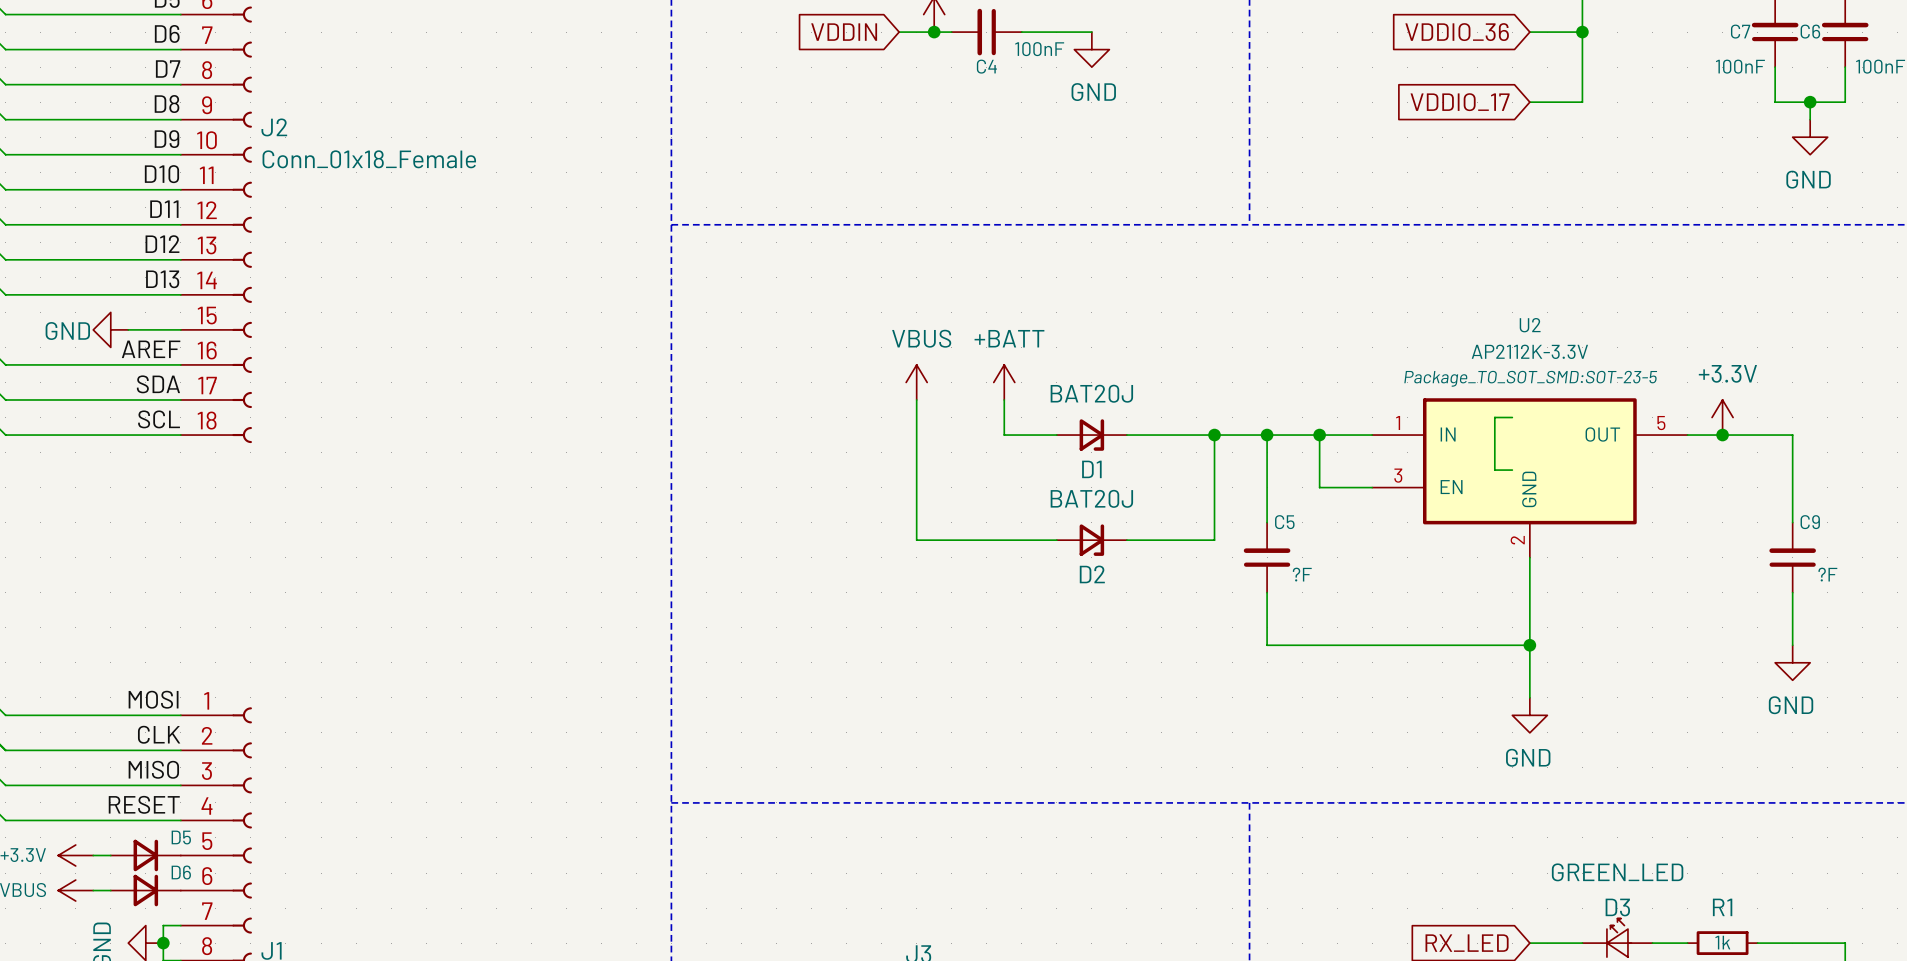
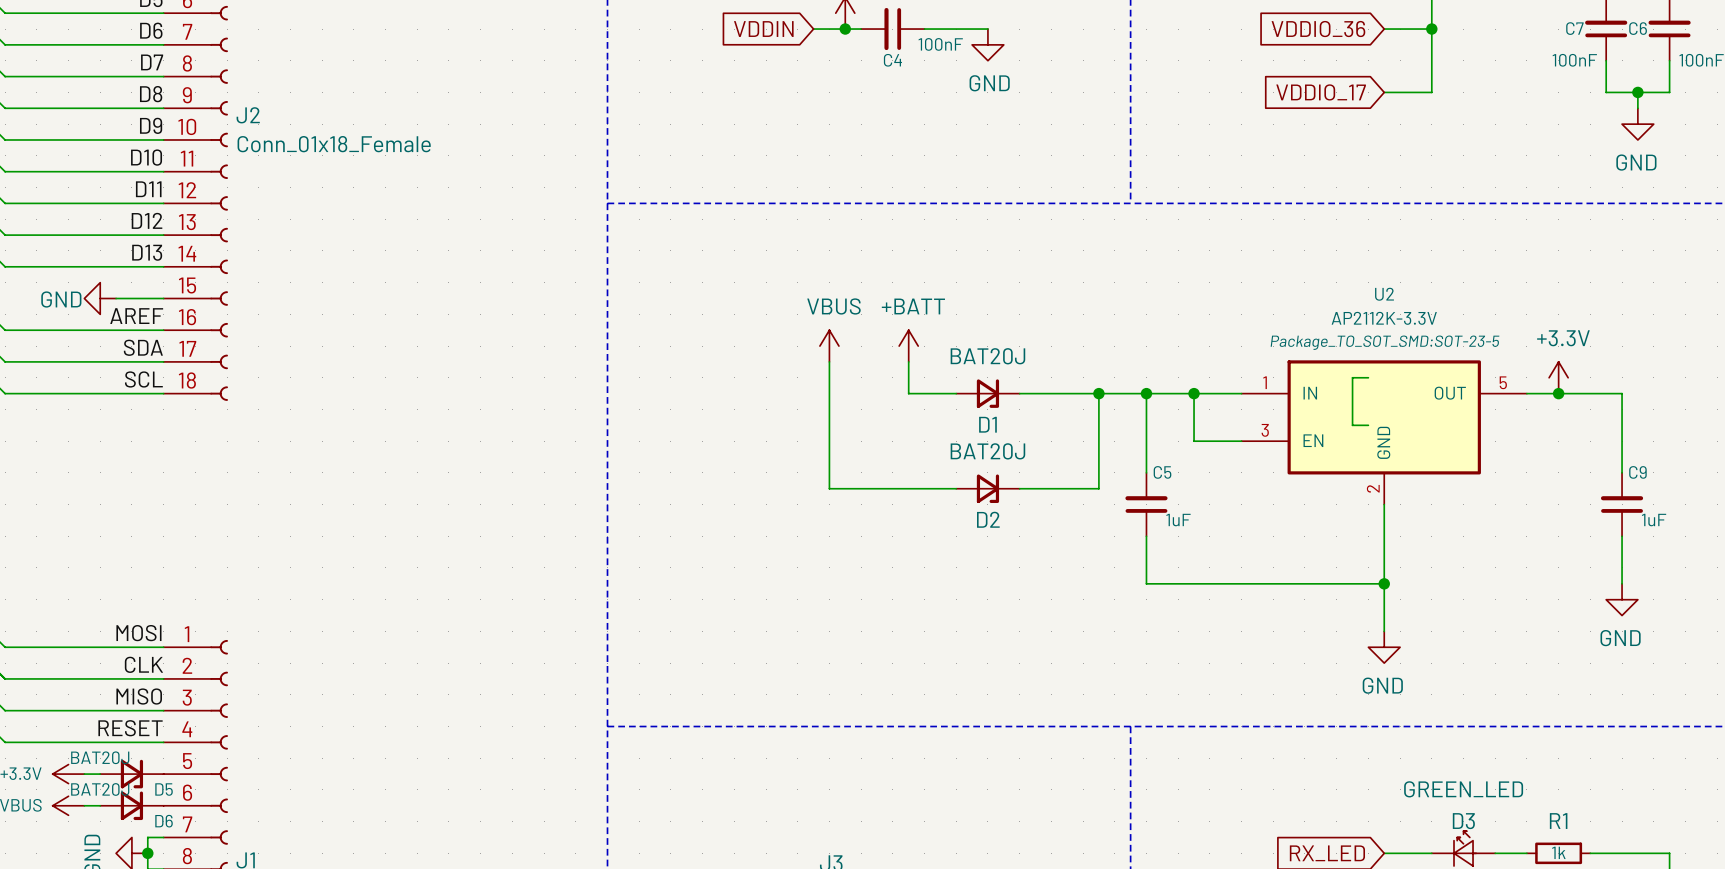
C5 value: ?F (1302, 574) -> 1uF (1178, 520)
C9 value: ?F (1827, 574) -> 1uF (1654, 520)
D5 value: none -> BAT20J (100, 757)
D5 name position: D5 (181, 837) -> D5 (164, 789)
D5 symbol: [110, 839, 181, 872] -> [100, 759, 164, 789]
D6 value: none -> BAT20J (100, 789)
D6 name position: D6 (181, 872) -> D6 (164, 821)
D6 symbol: [110, 874, 181, 907] -> [100, 791, 164, 821]

